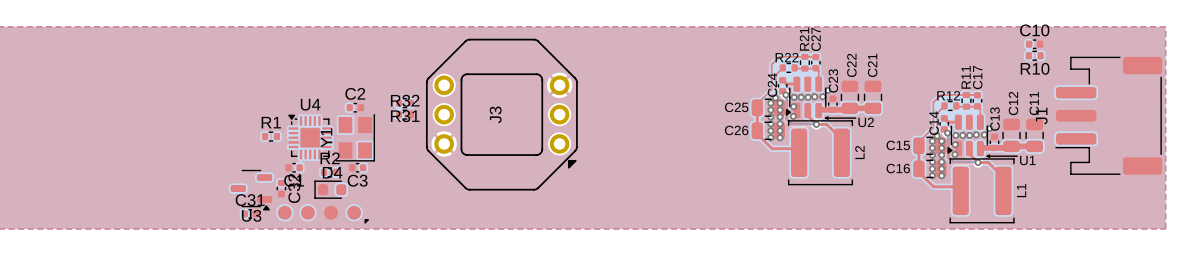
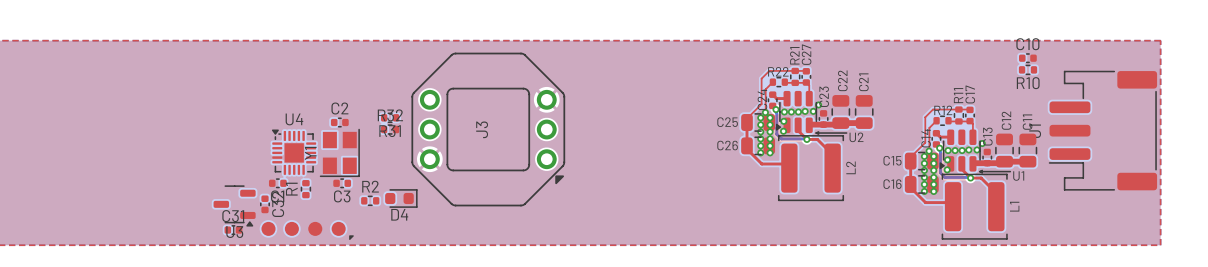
R1 rotation: 0° (271, 136) -> 90° clockwise (305, 189)
R1 position: (271, 136) -> (305, 189)
R2 position: (329, 172) -> (370, 200)
D4 rotation: 0° (330, 189) -> 180° (401, 198)
D4 position: (330, 189) -> (401, 198)

